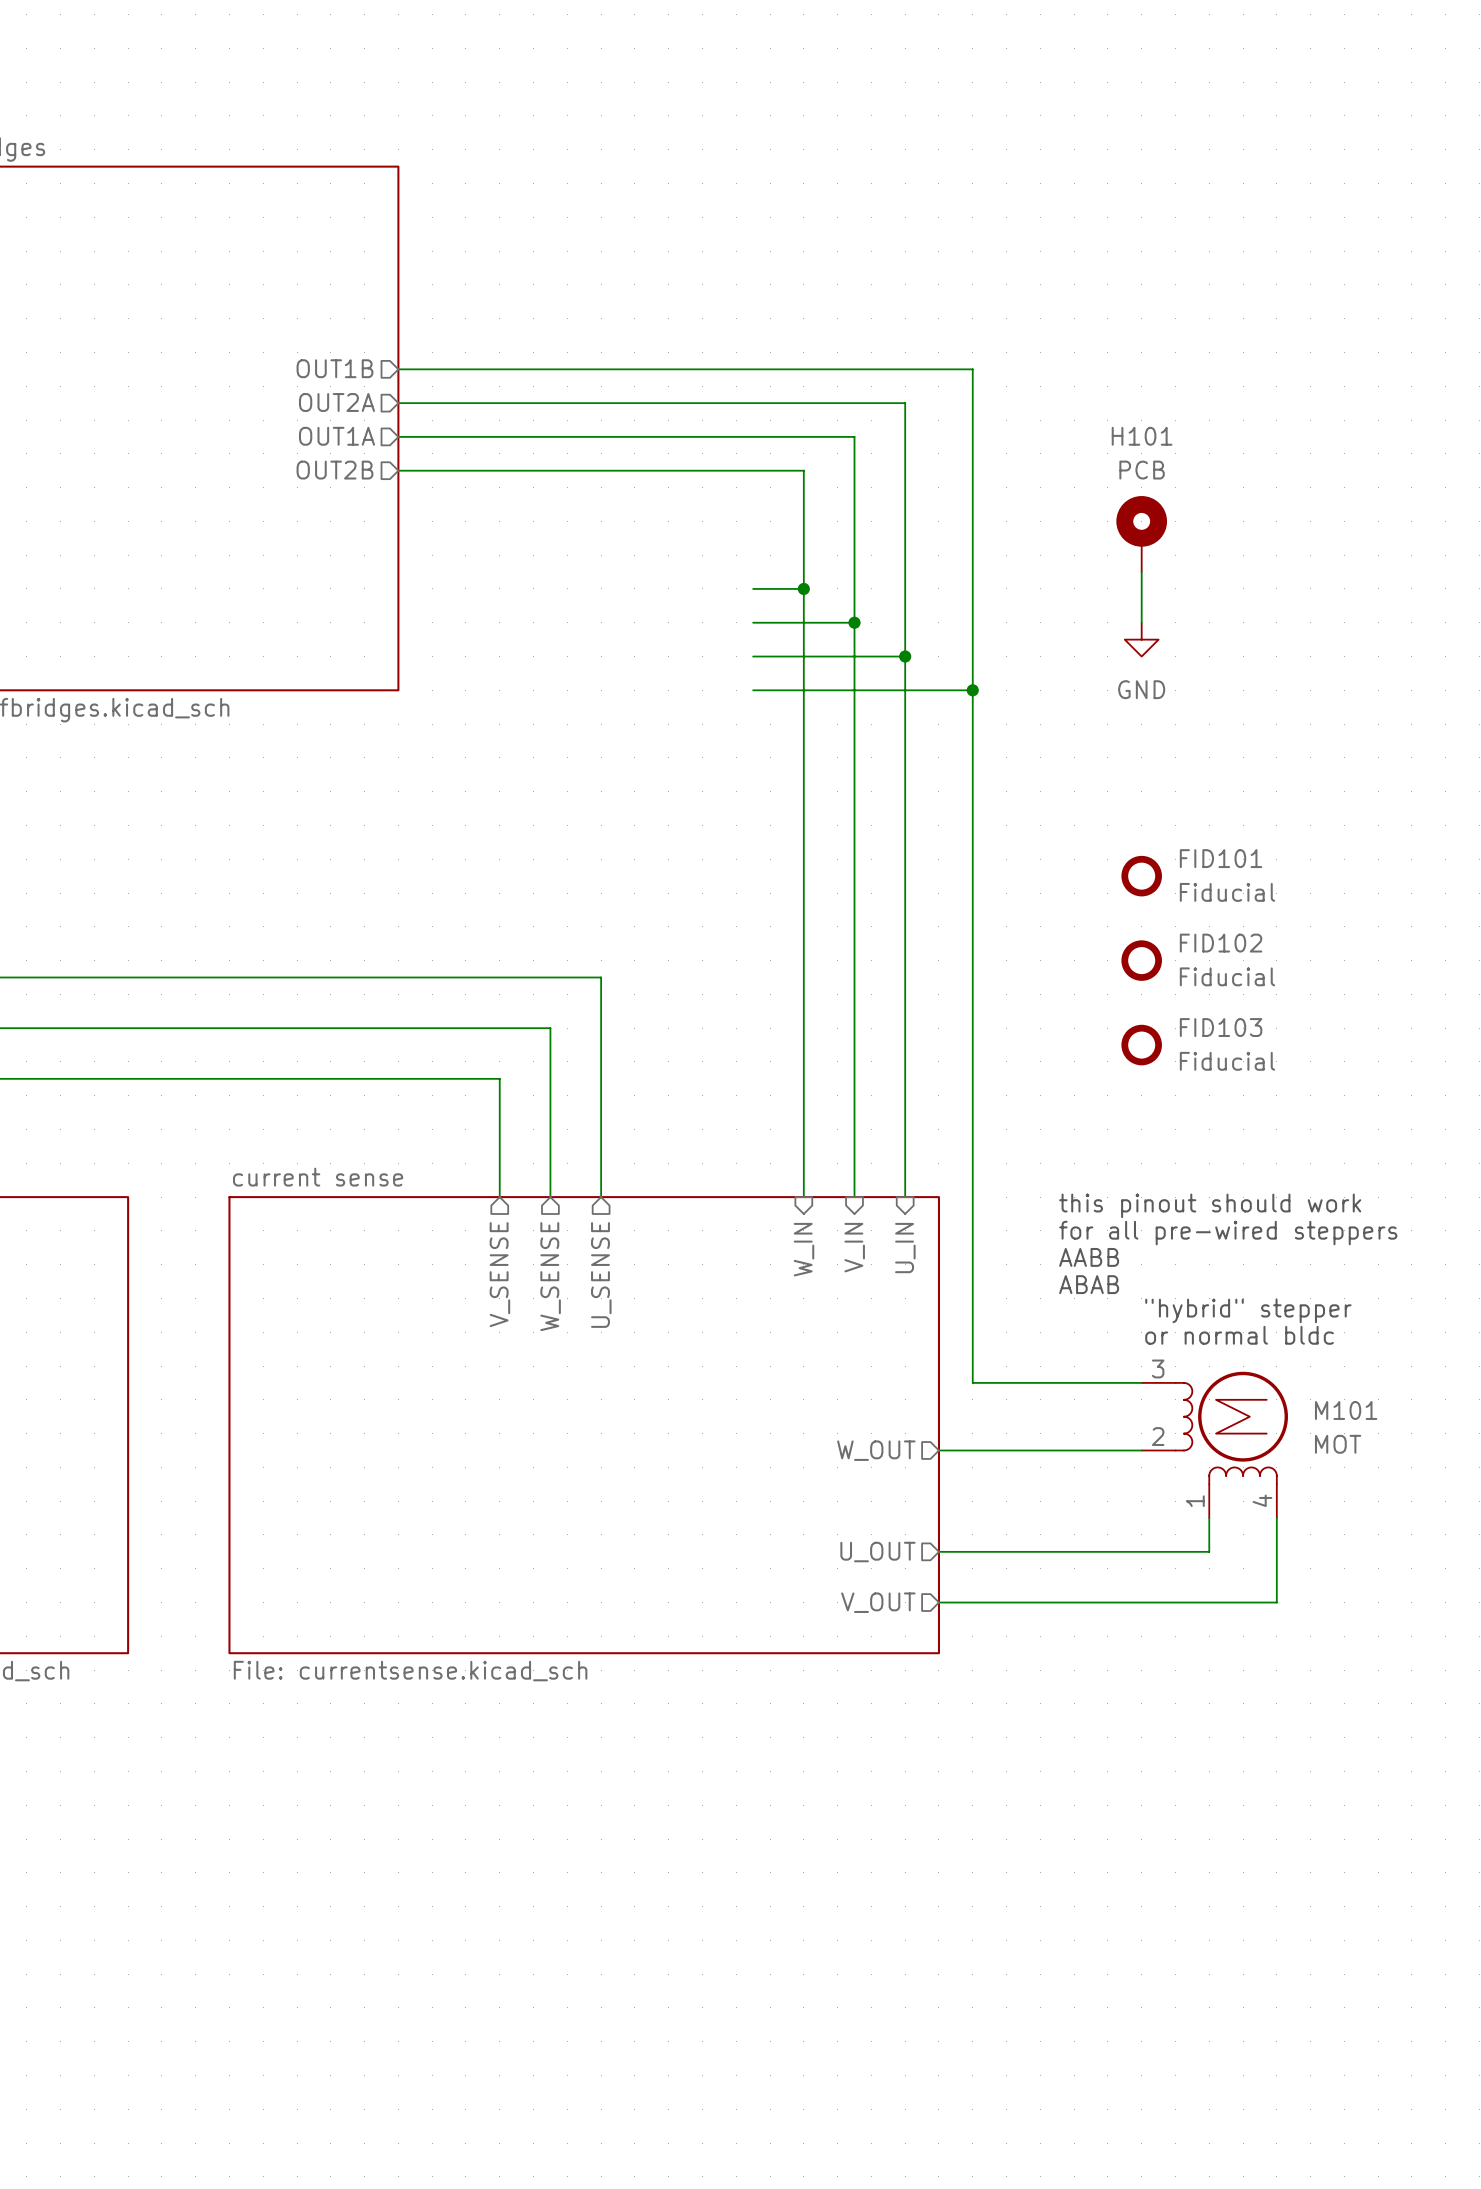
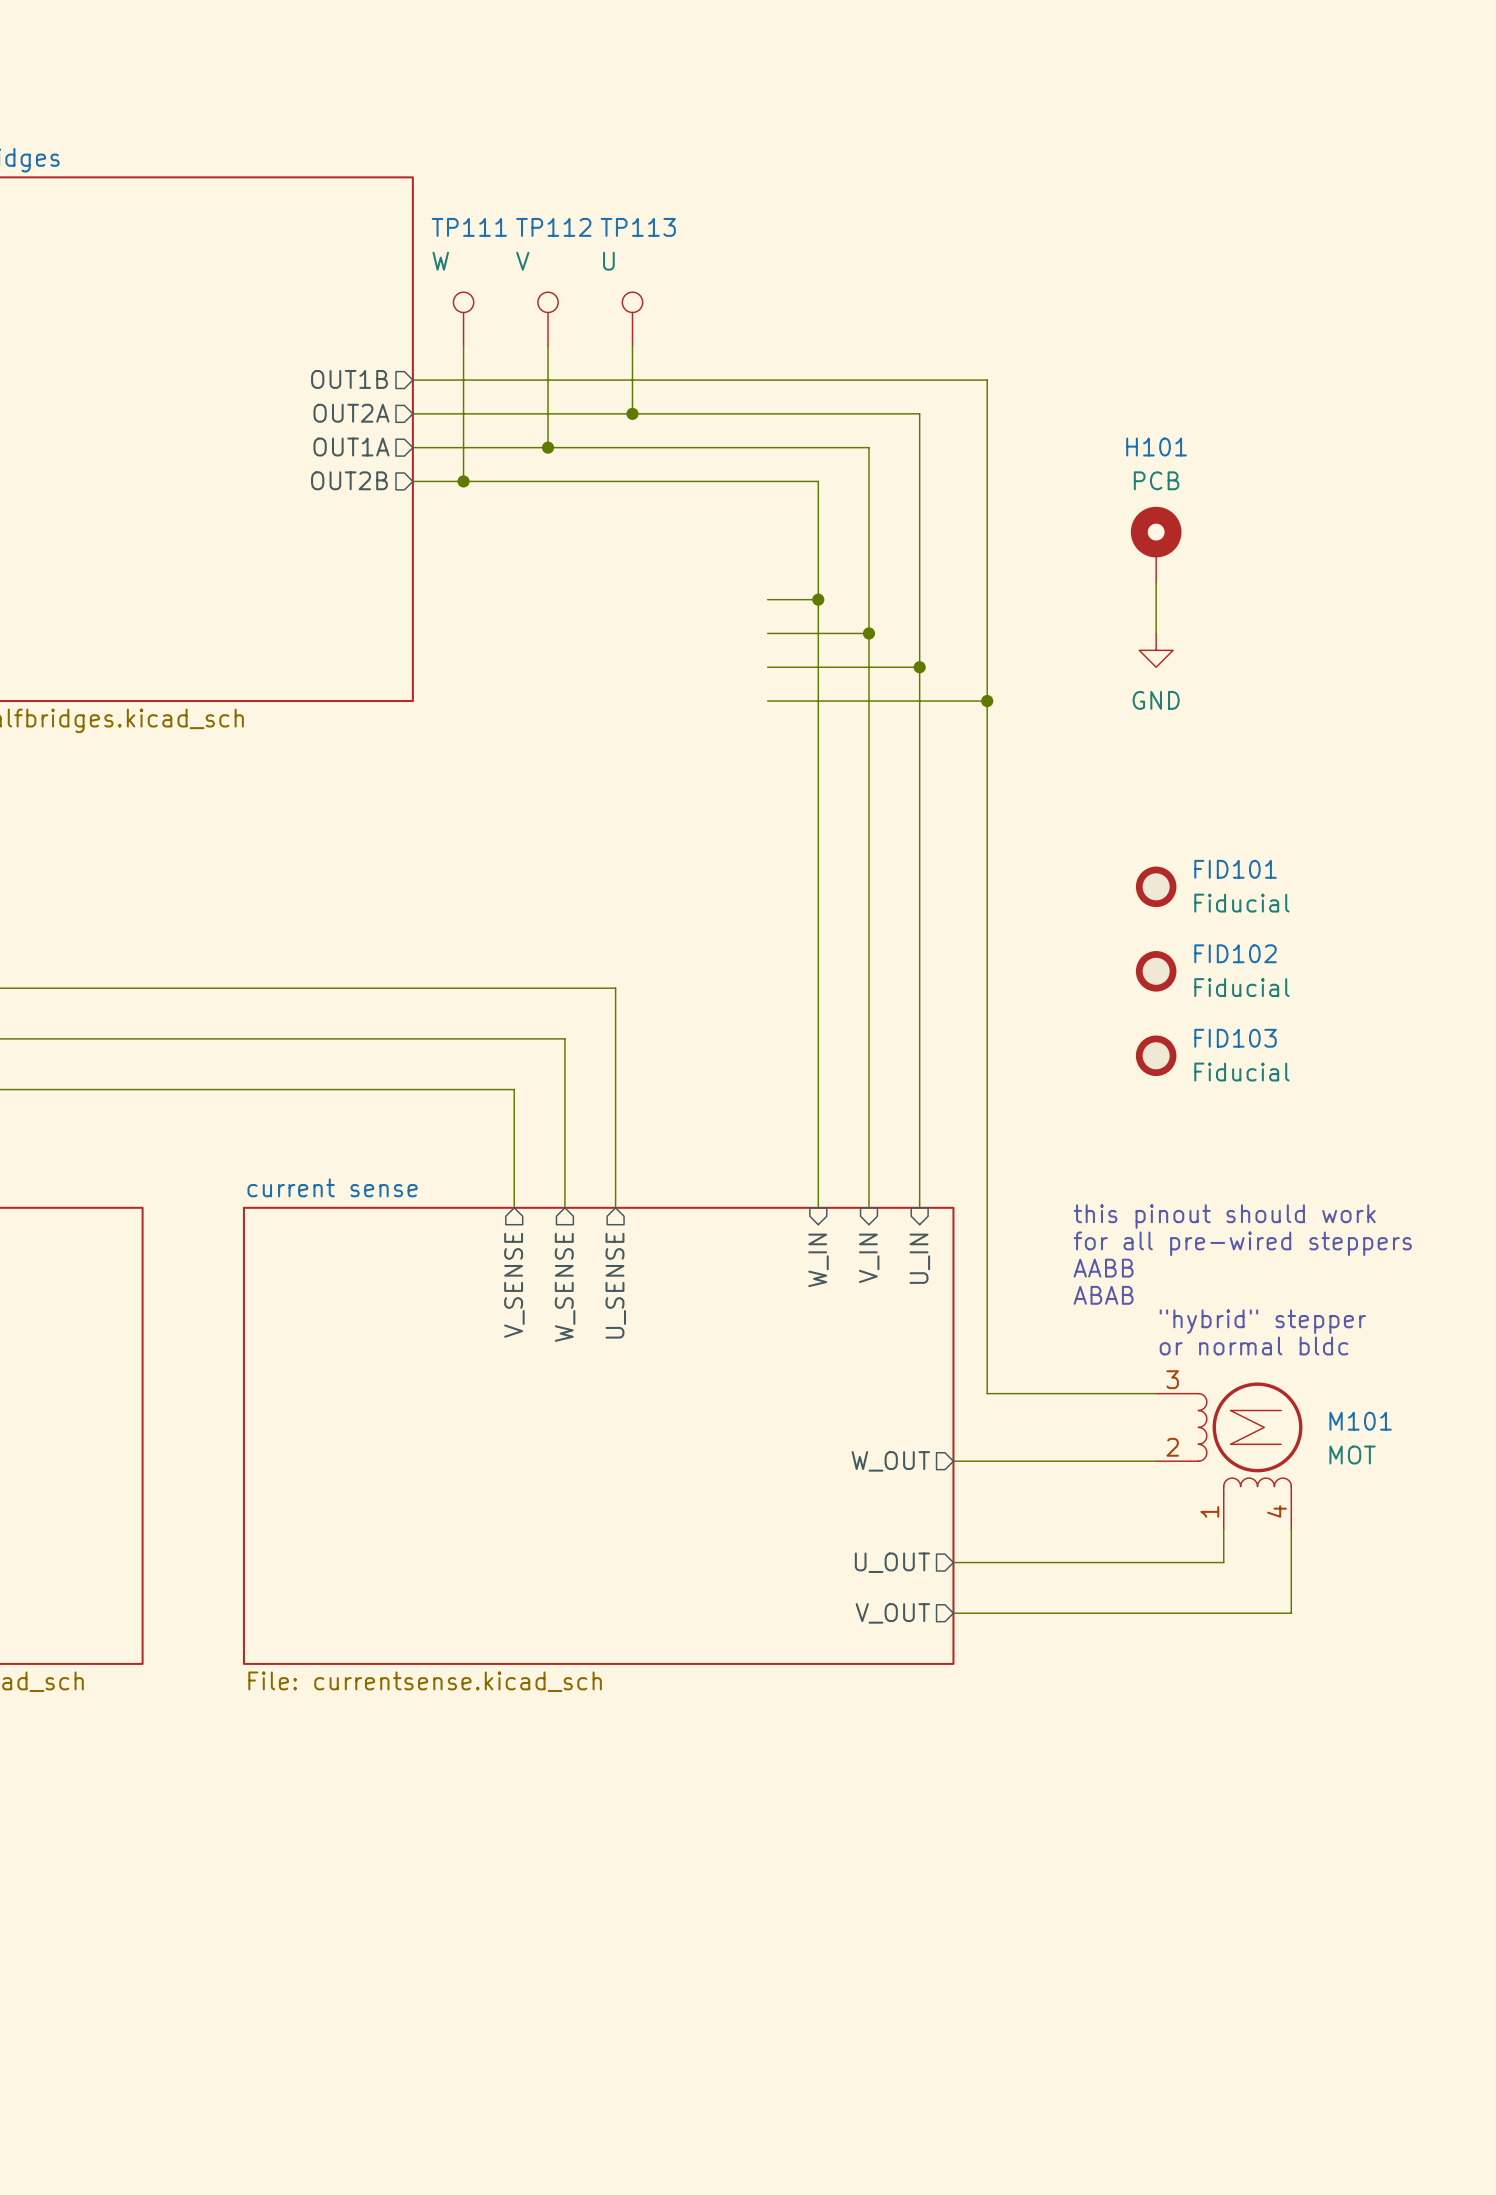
TP111: none -> W (463, 319)
TP112: none -> V (548, 319)
TP113: none -> U (632, 319)
wire: none -> (463, 346) (463, 481)
wire: none -> (548, 346) (548, 447)
wire: none -> (632, 346) (632, 413)
junction: none -> (632, 413)
junction: none -> (548, 447)
junction: none -> (463, 481)

